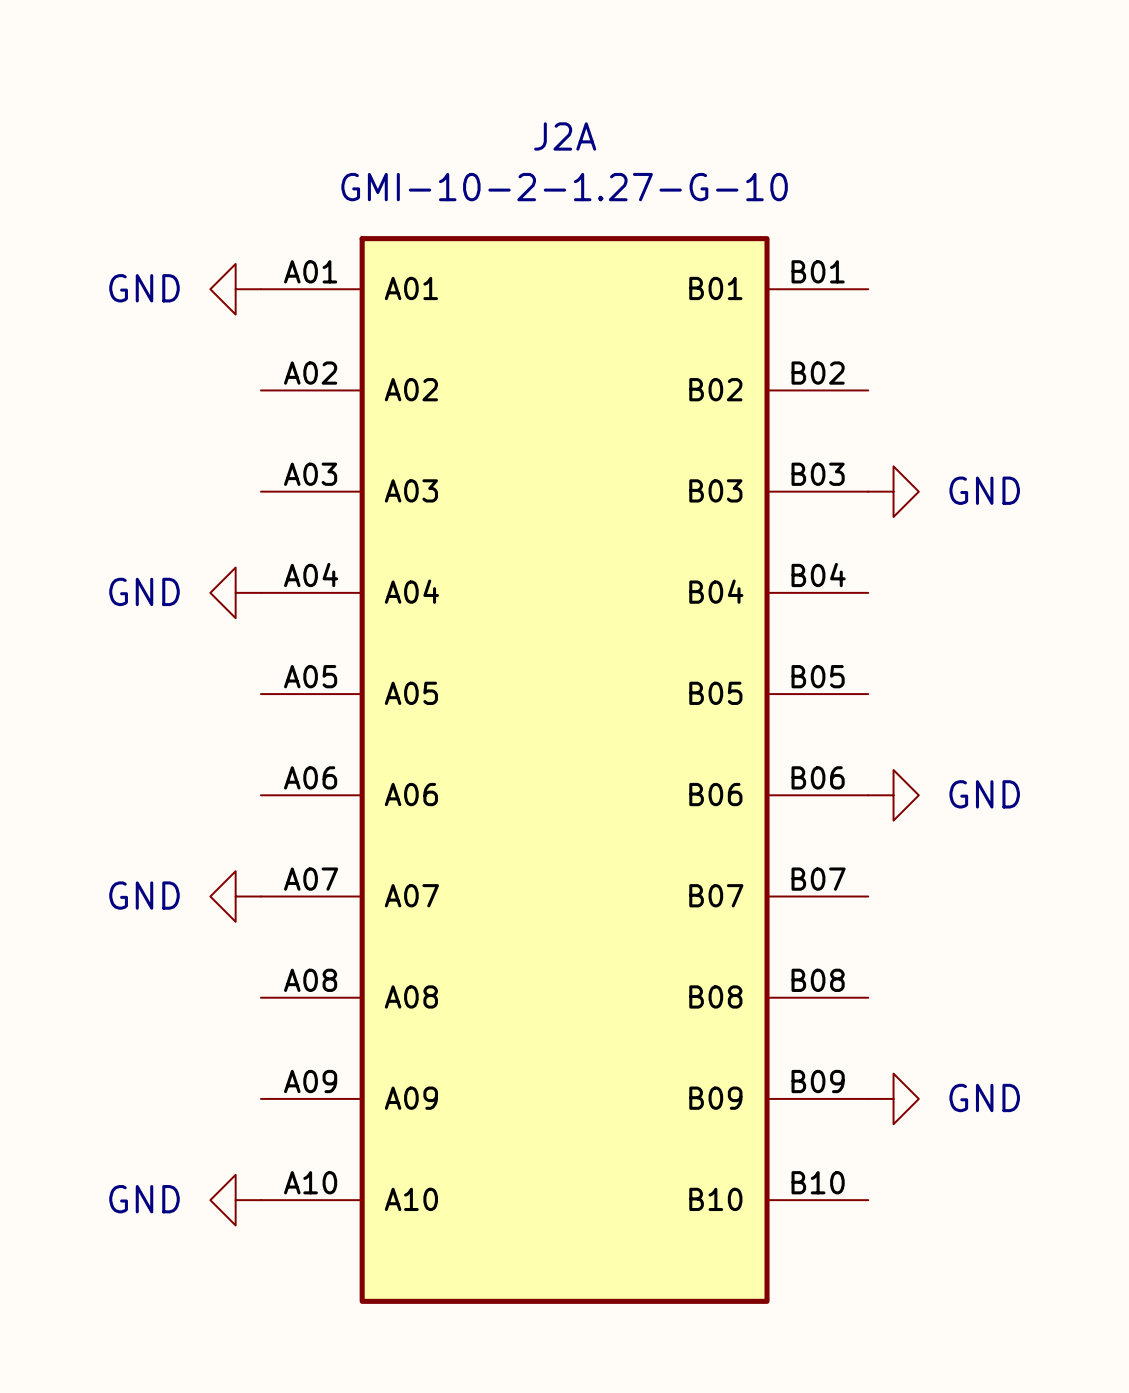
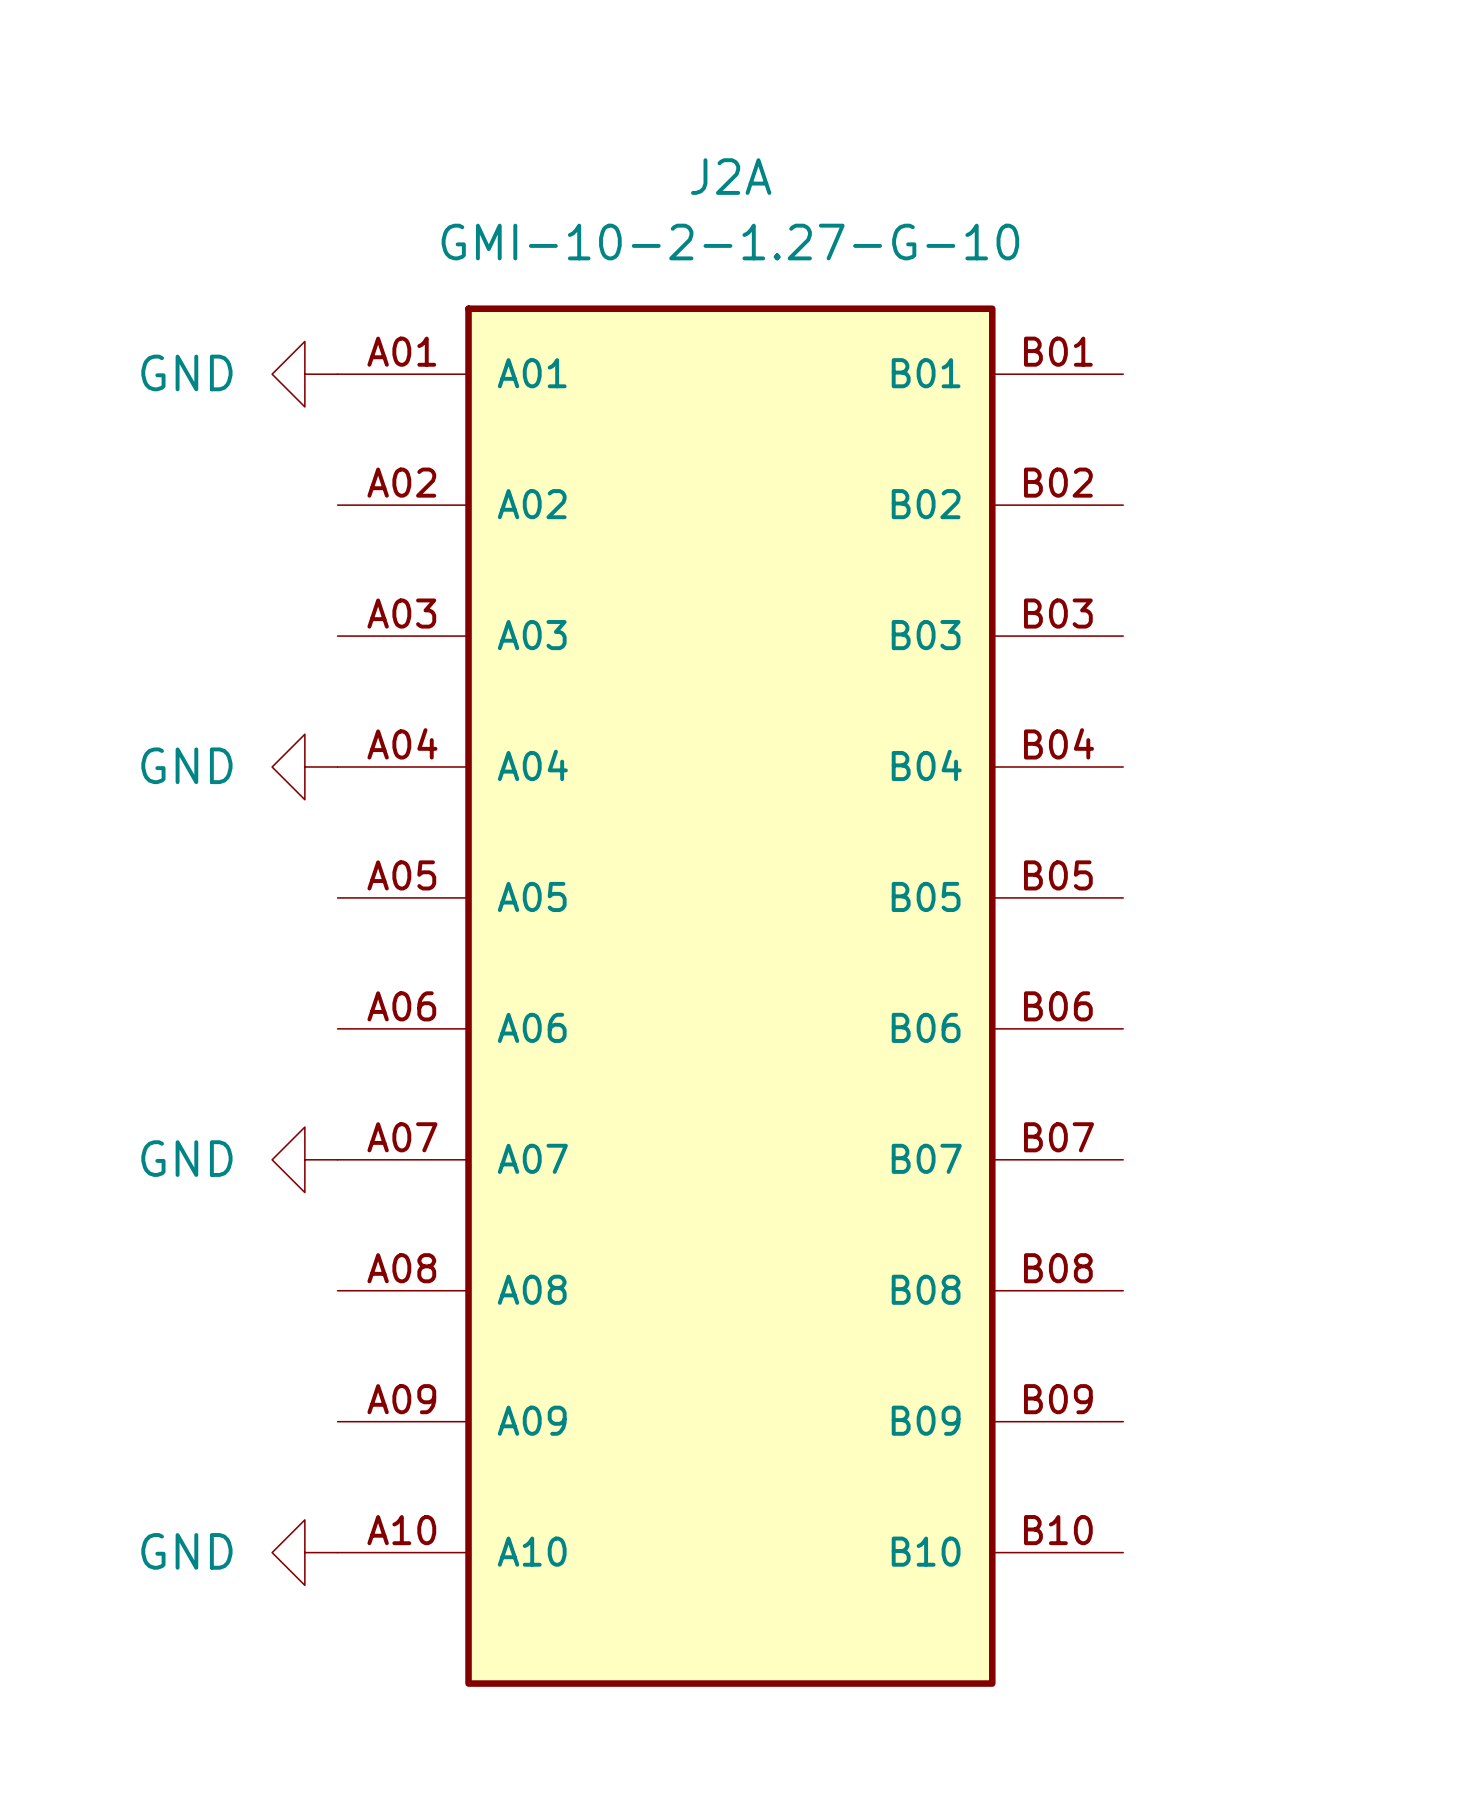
power symbol: GND (893, 491) -> none
power symbol: GND (893, 795) -> none
power symbol: GND (893, 1098) -> none

